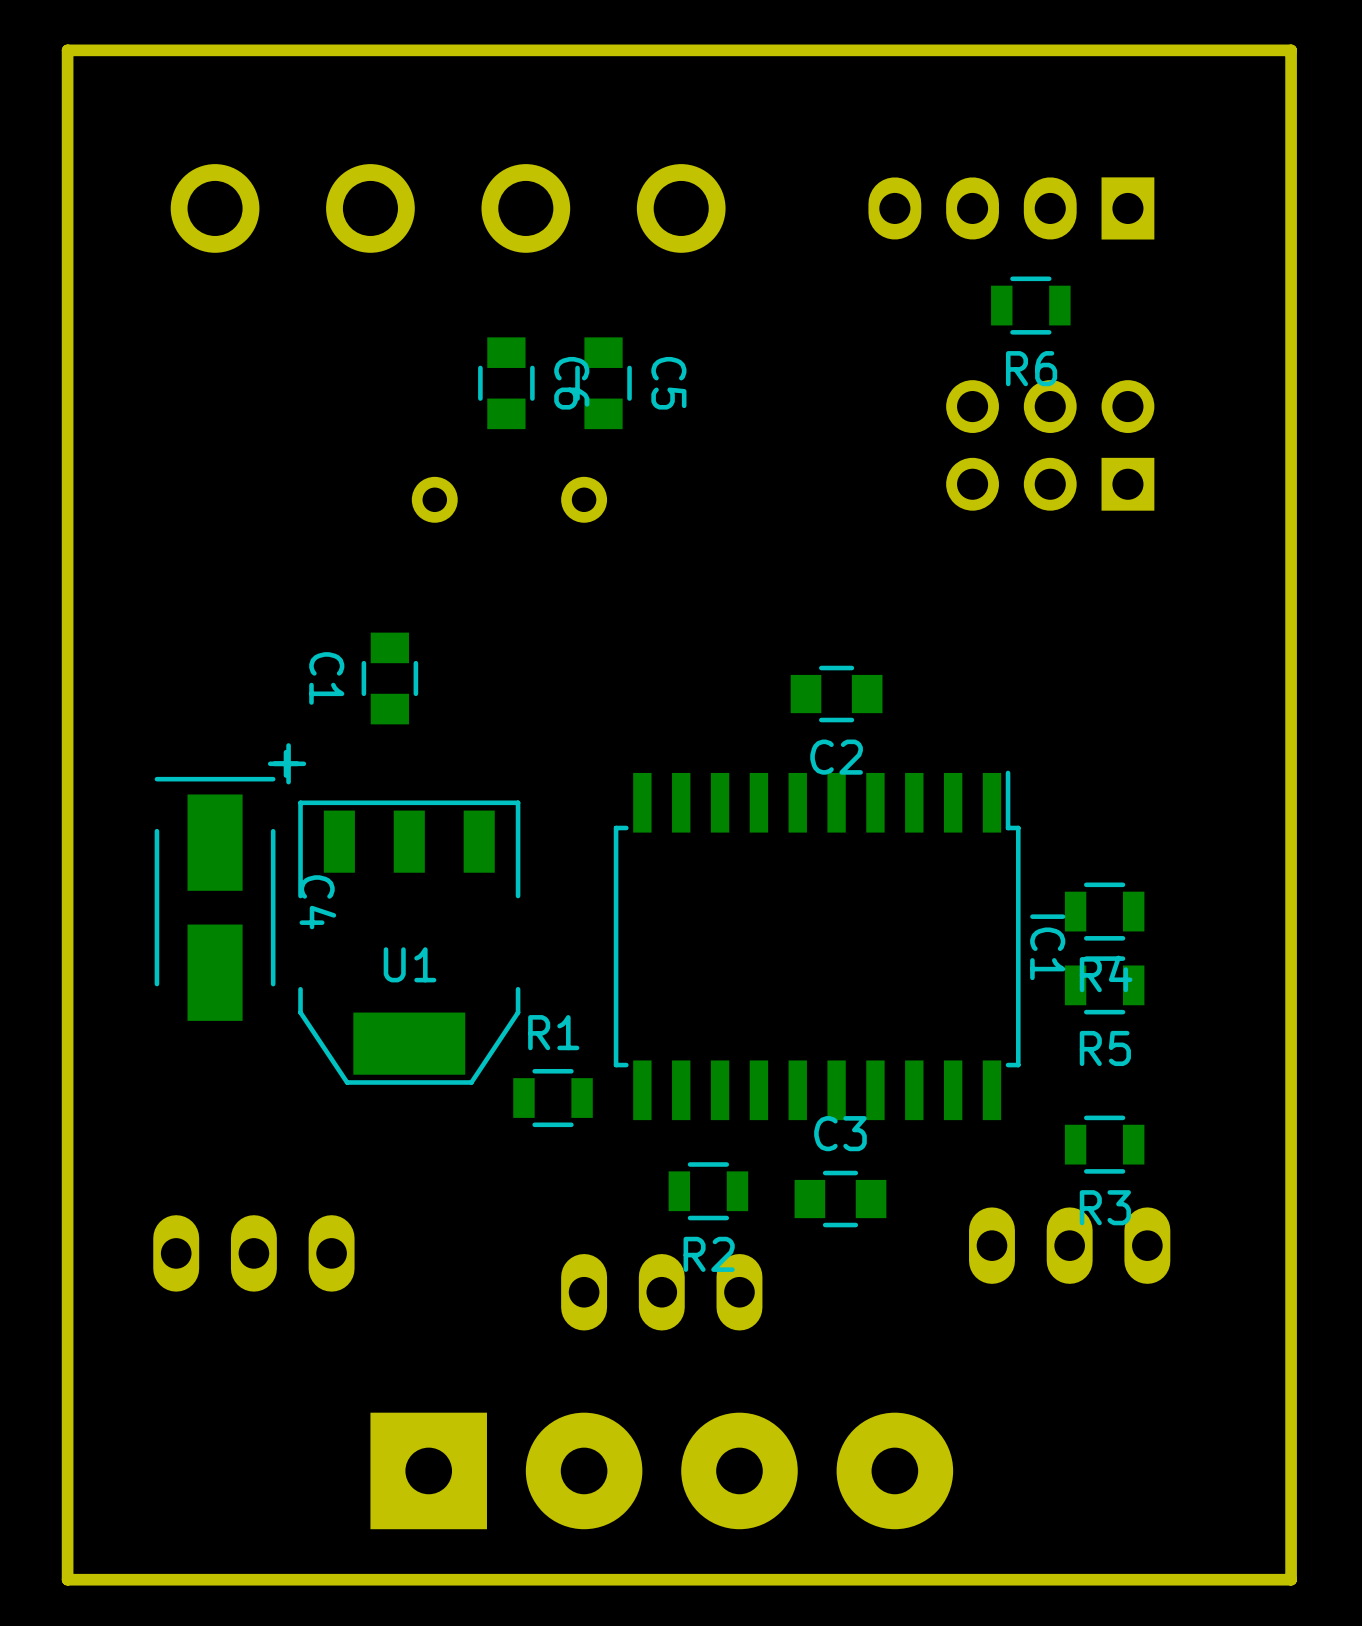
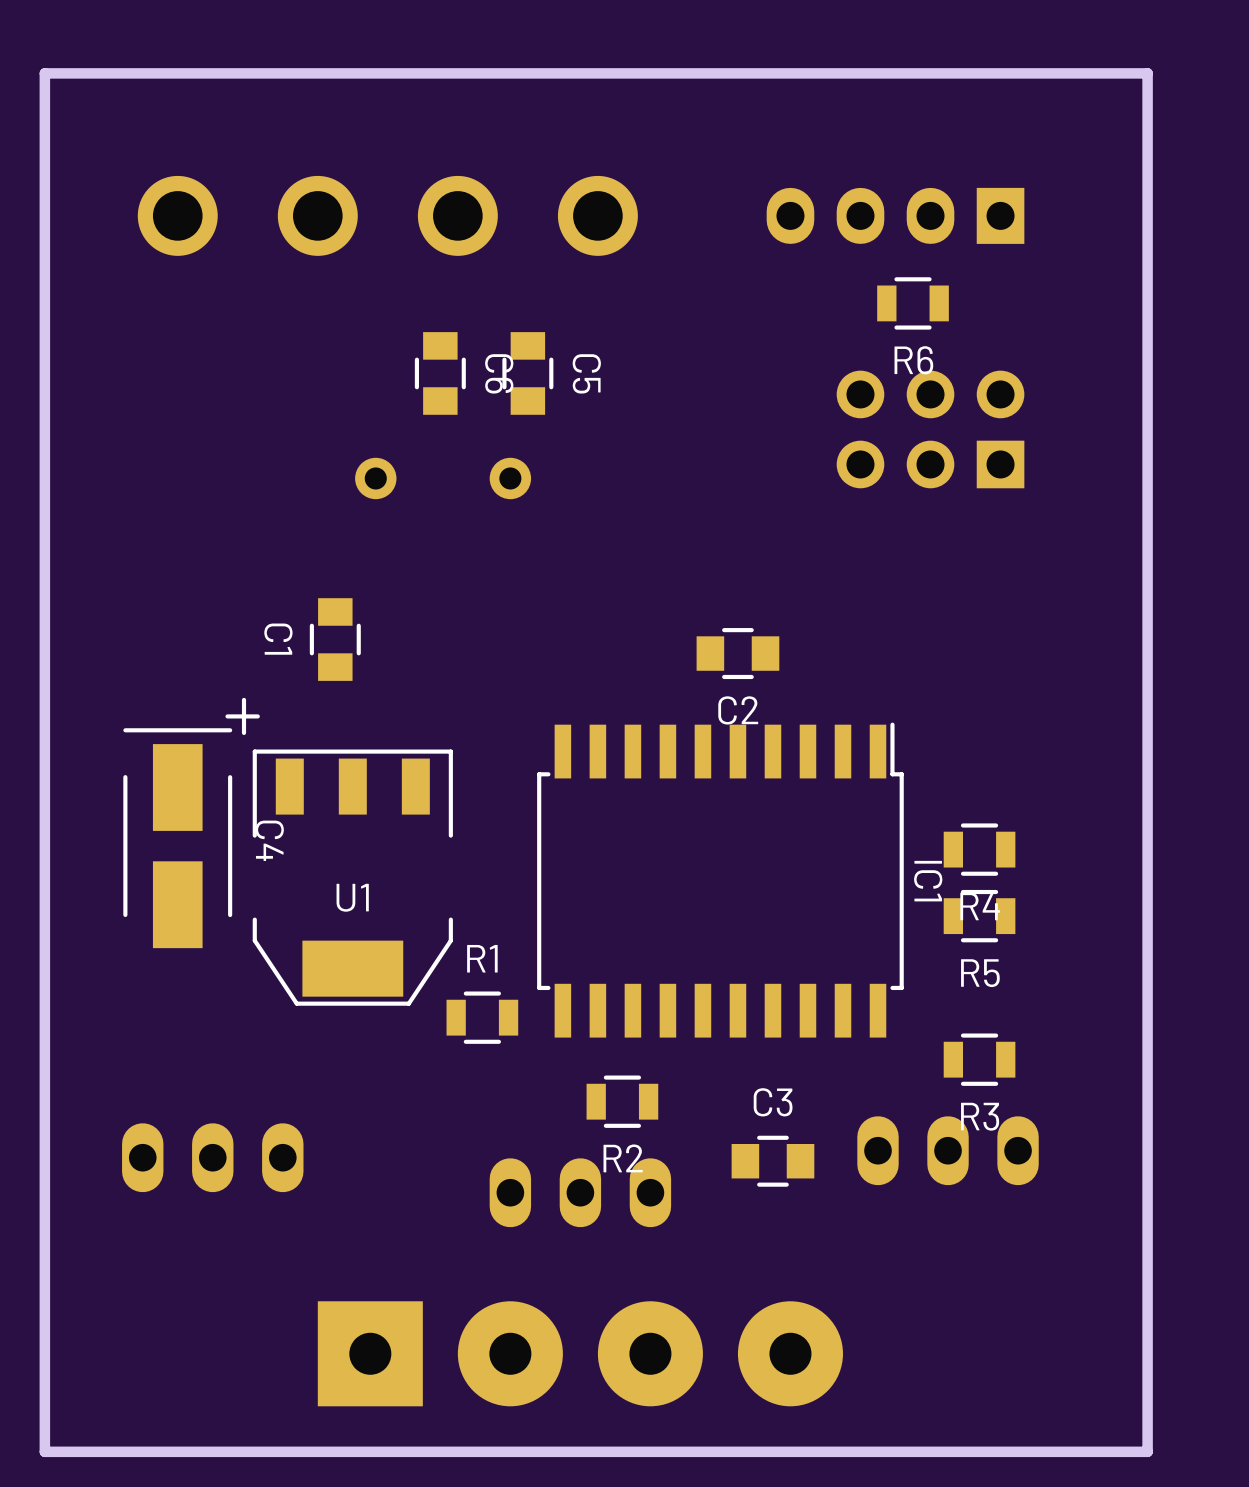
C3 position: (840, 1199) -> (772, 1161)

